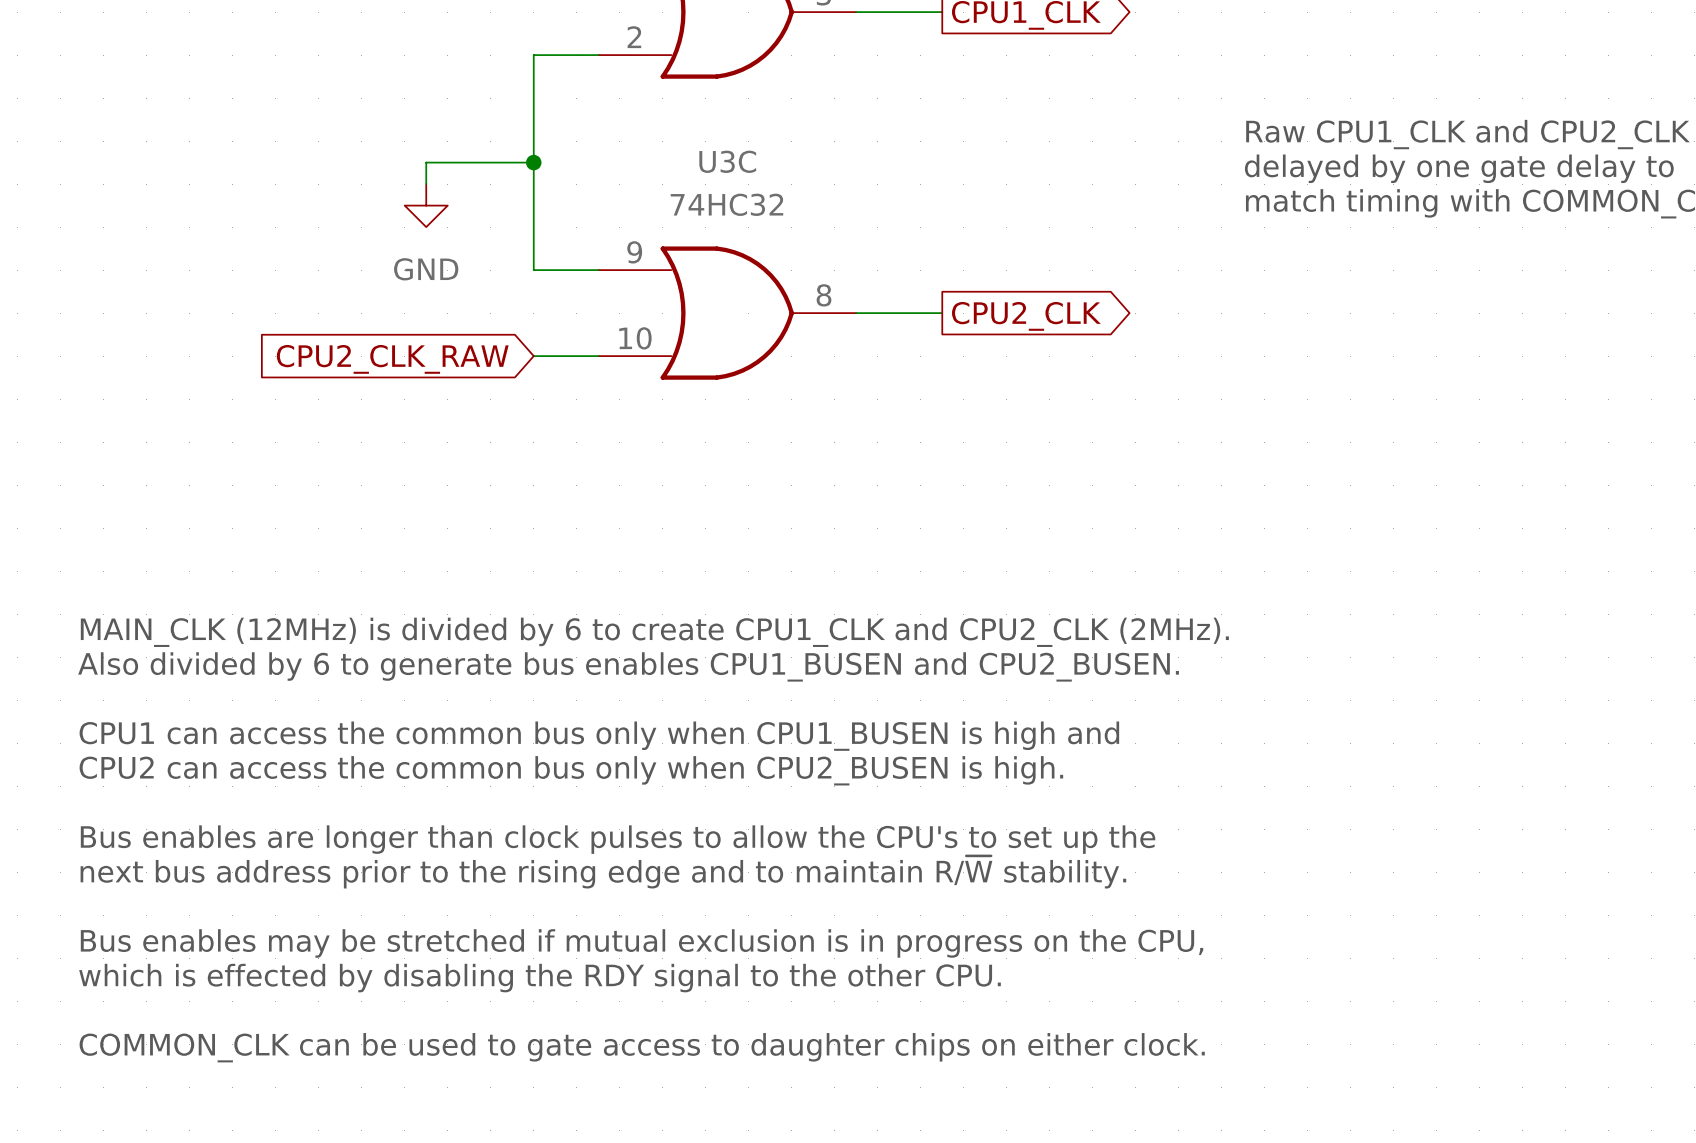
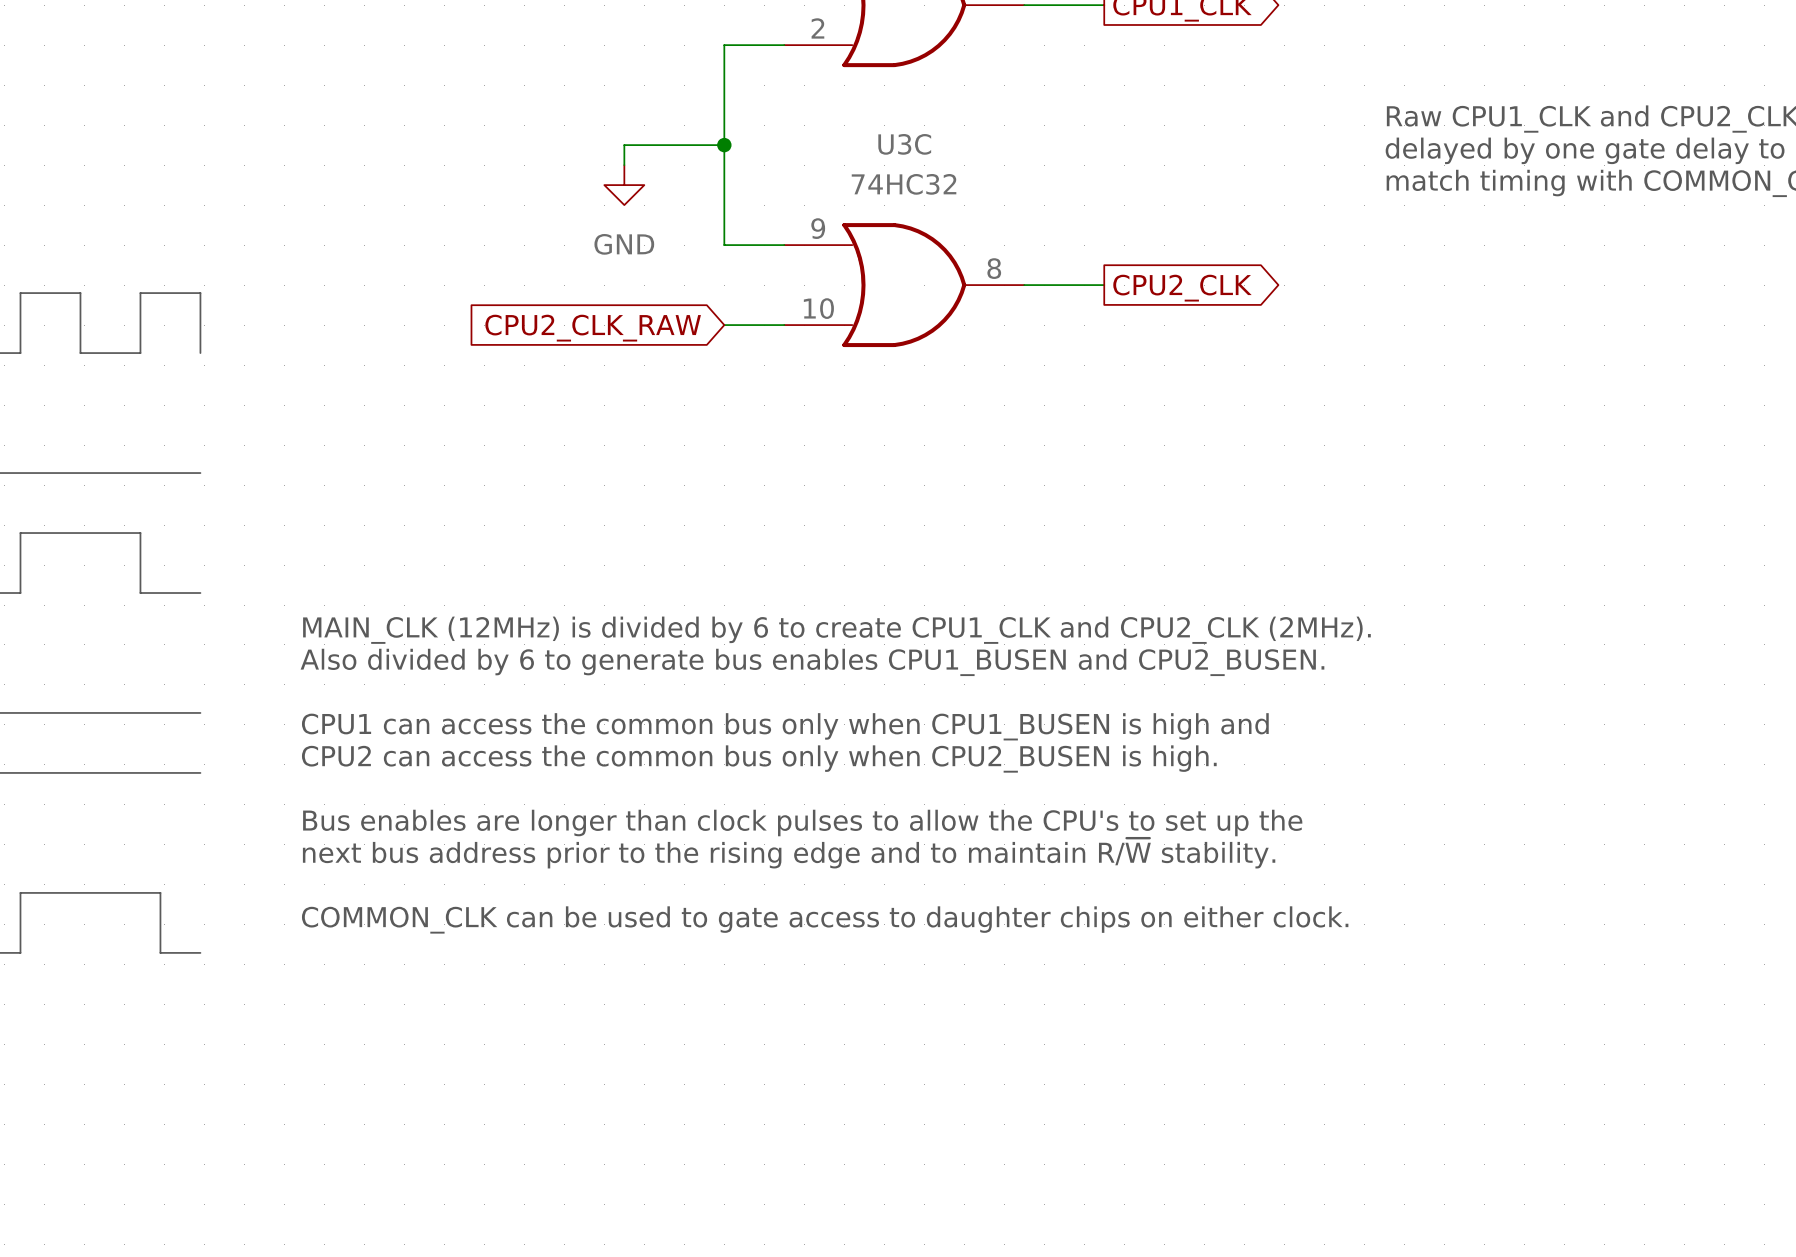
text position: MAIN_CLK (12MHz) is divided by 6 to create CPU1_CLK and CPU2_CLK (2MHz). (654, 632) -> MAIN_CLK (12MHz) is divided by 6 to create CPU1_CLK and CPU2_CLK (2MHz). (836, 630)
text position: Also divided by 6 to generate bus enables CPU1_BUSEN and CPU2_BUSEN. (628, 666) -> Also divided by 6 to generate bus enables CPU1_BUSEN and CPU2_BUSEN. (812, 662)
text position: CPU1 can access the common bus only when CPU1_BUSEN is high and (599, 736) -> CPU1 can access the common bus only when CPU1_BUSEN is high and (785, 726)
text position: CPU2 can access the common bus only when CPU2_BUSEN is high. (571, 770) -> CPU2 can access the common bus only when CPU2_BUSEN is high. (759, 758)
text position: Bus enables are longer than clock pulses to allow the CPU's to set up the (618, 839) -> Bus enables are longer than clock pulses to allow the CPU's to set up the (802, 822)
text position: next bus address prior to the rising edge and to maintain R/~{W} stability. (603, 872) -> next bus address prior to the rising edge and to maintain R/~{W} stability. (789, 853)
text: Bus enables may be stretched if mutual exclusion is in progress on the CPU, (642, 943) -> none
text: which is effected by disabling the RDY signal to the other CPU. (540, 978) -> none
text position: COMMON_CLK can be used to gate access to daughter chips on either clock. (642, 1047) -> COMMON_CLK can be used to gate access to daughter chips on either clock. (825, 919)

